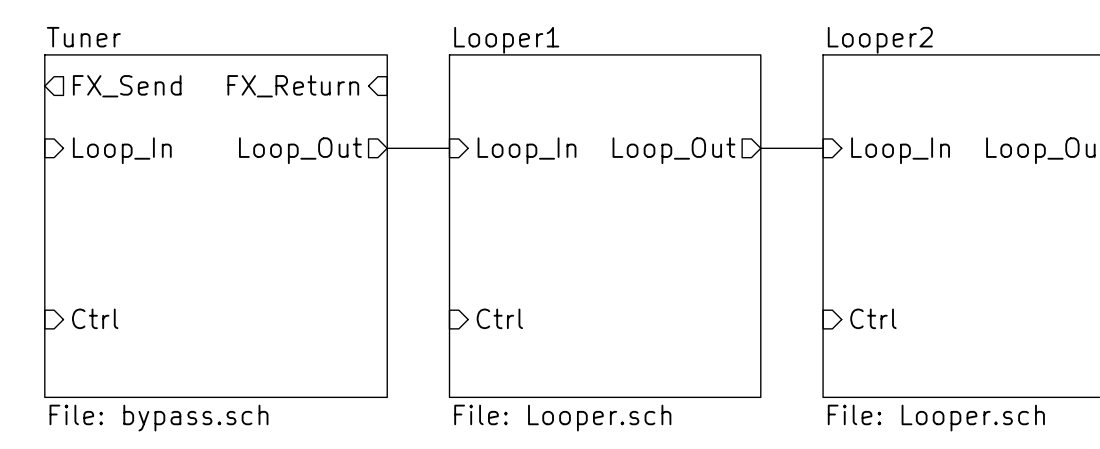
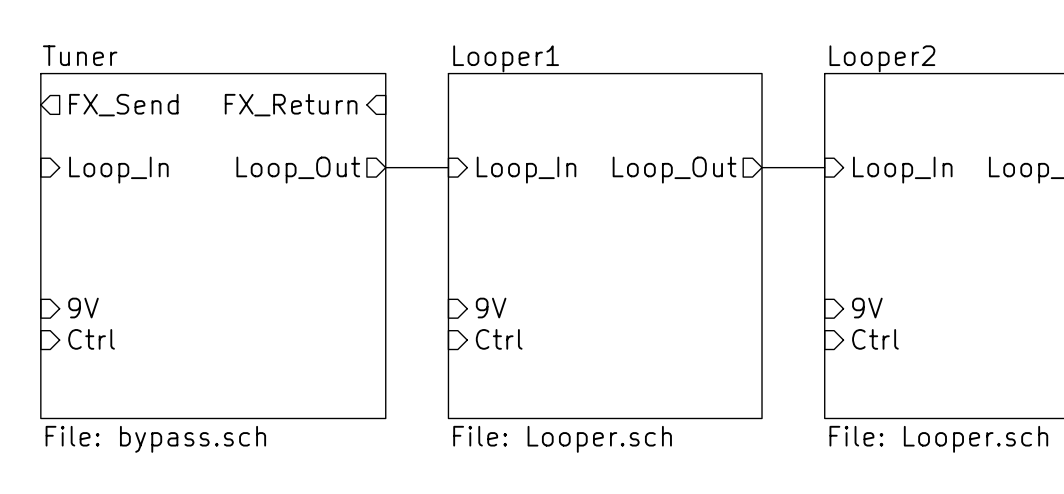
sheet pin: none -> 9V (83, 308)
sheet pin: none -> 9V (491, 308)
sheet pin: none -> 9V (867, 308)

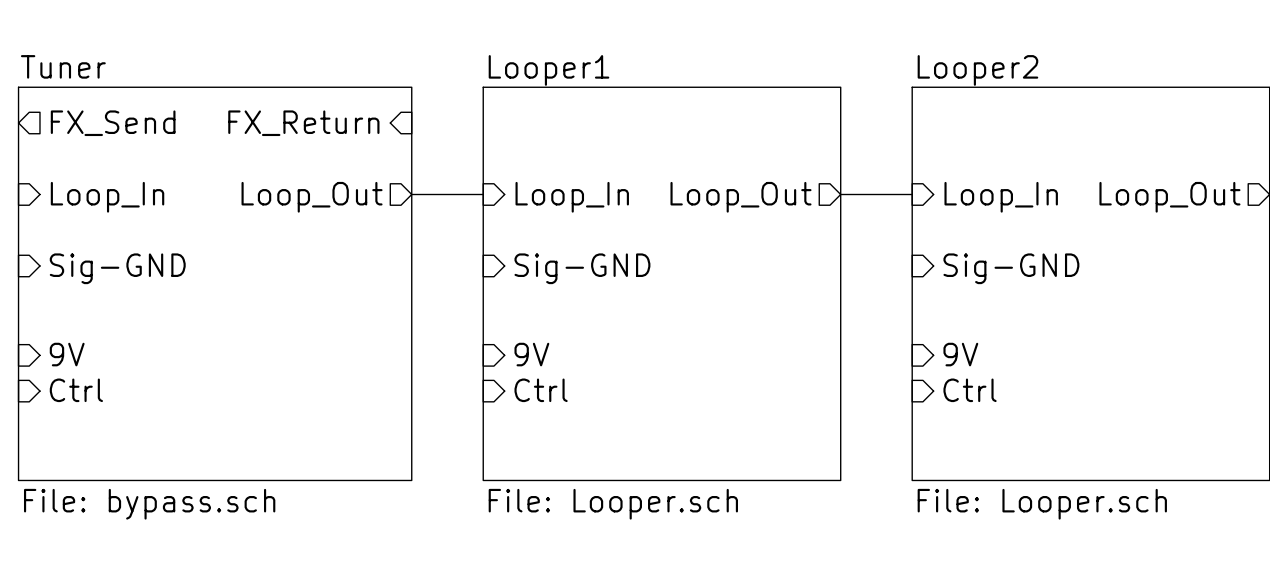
sheet pin: none -> Sig-GND (117, 268)
sheet pin: none -> Sig-GND (582, 268)
sheet pin: none -> Sig-GND (1011, 268)

